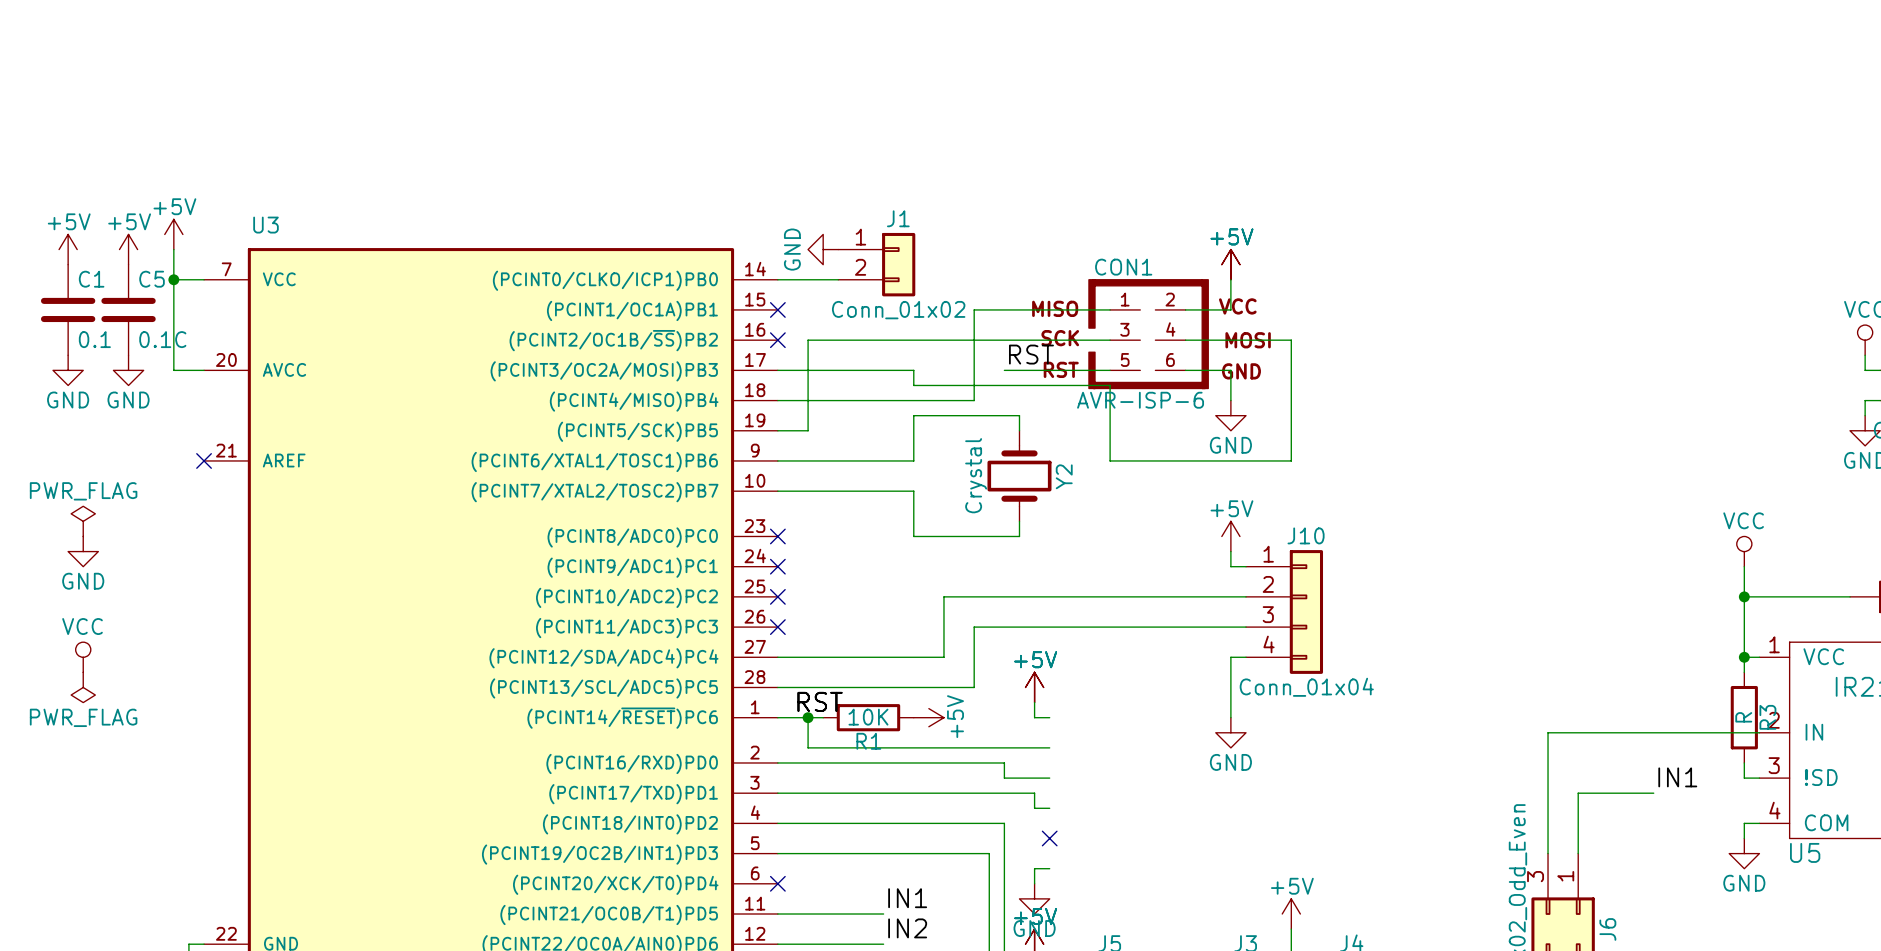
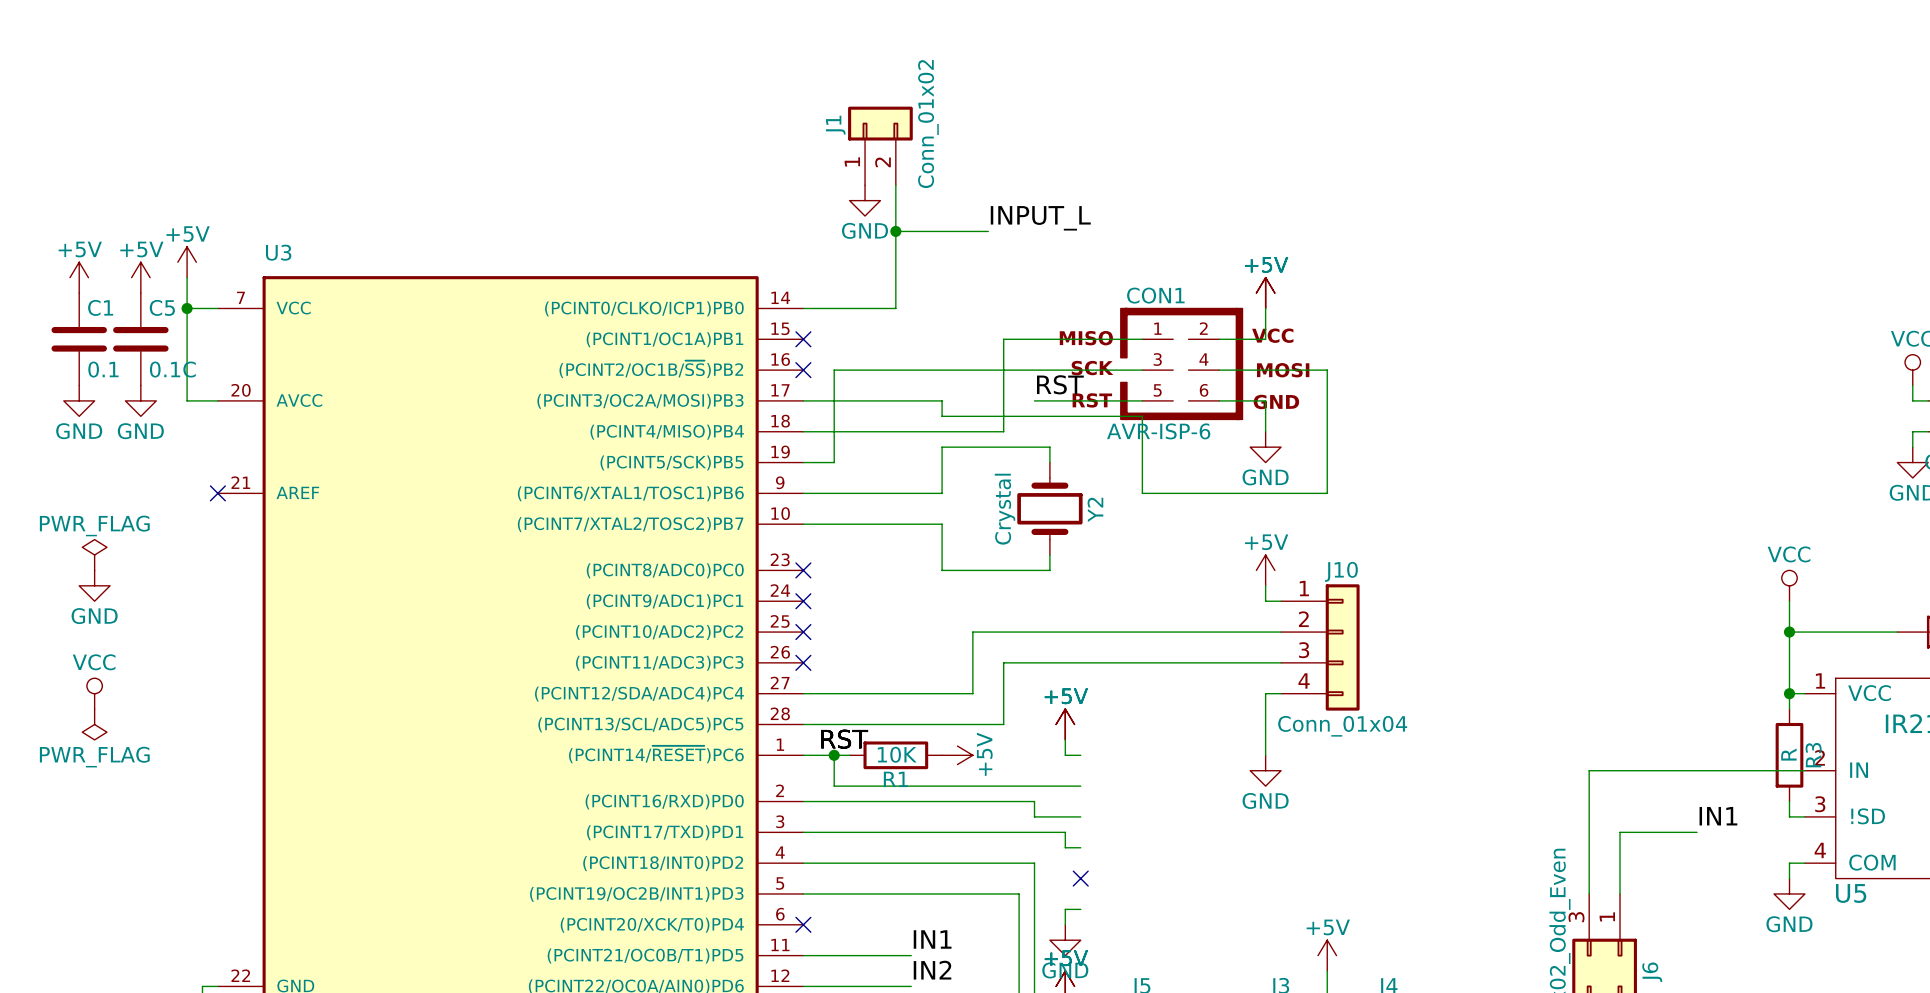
wire: none -> (895, 185) (895, 308) (865, 308)
label: none -> INPUT_L (1040, 218)
wire: none -> (895, 231) (988, 231)
junction: none -> (895, 231)
power symbol rotation: 0° (823, 249) -> 90° counterclockwise (865, 200)
power symbol position: GND (823, 249) -> GND (865, 200)
J1 position: (876, 264) -> (880, 145)
J1 rotation: 0° (898, 264) -> 90° counterclockwise (880, 123)

